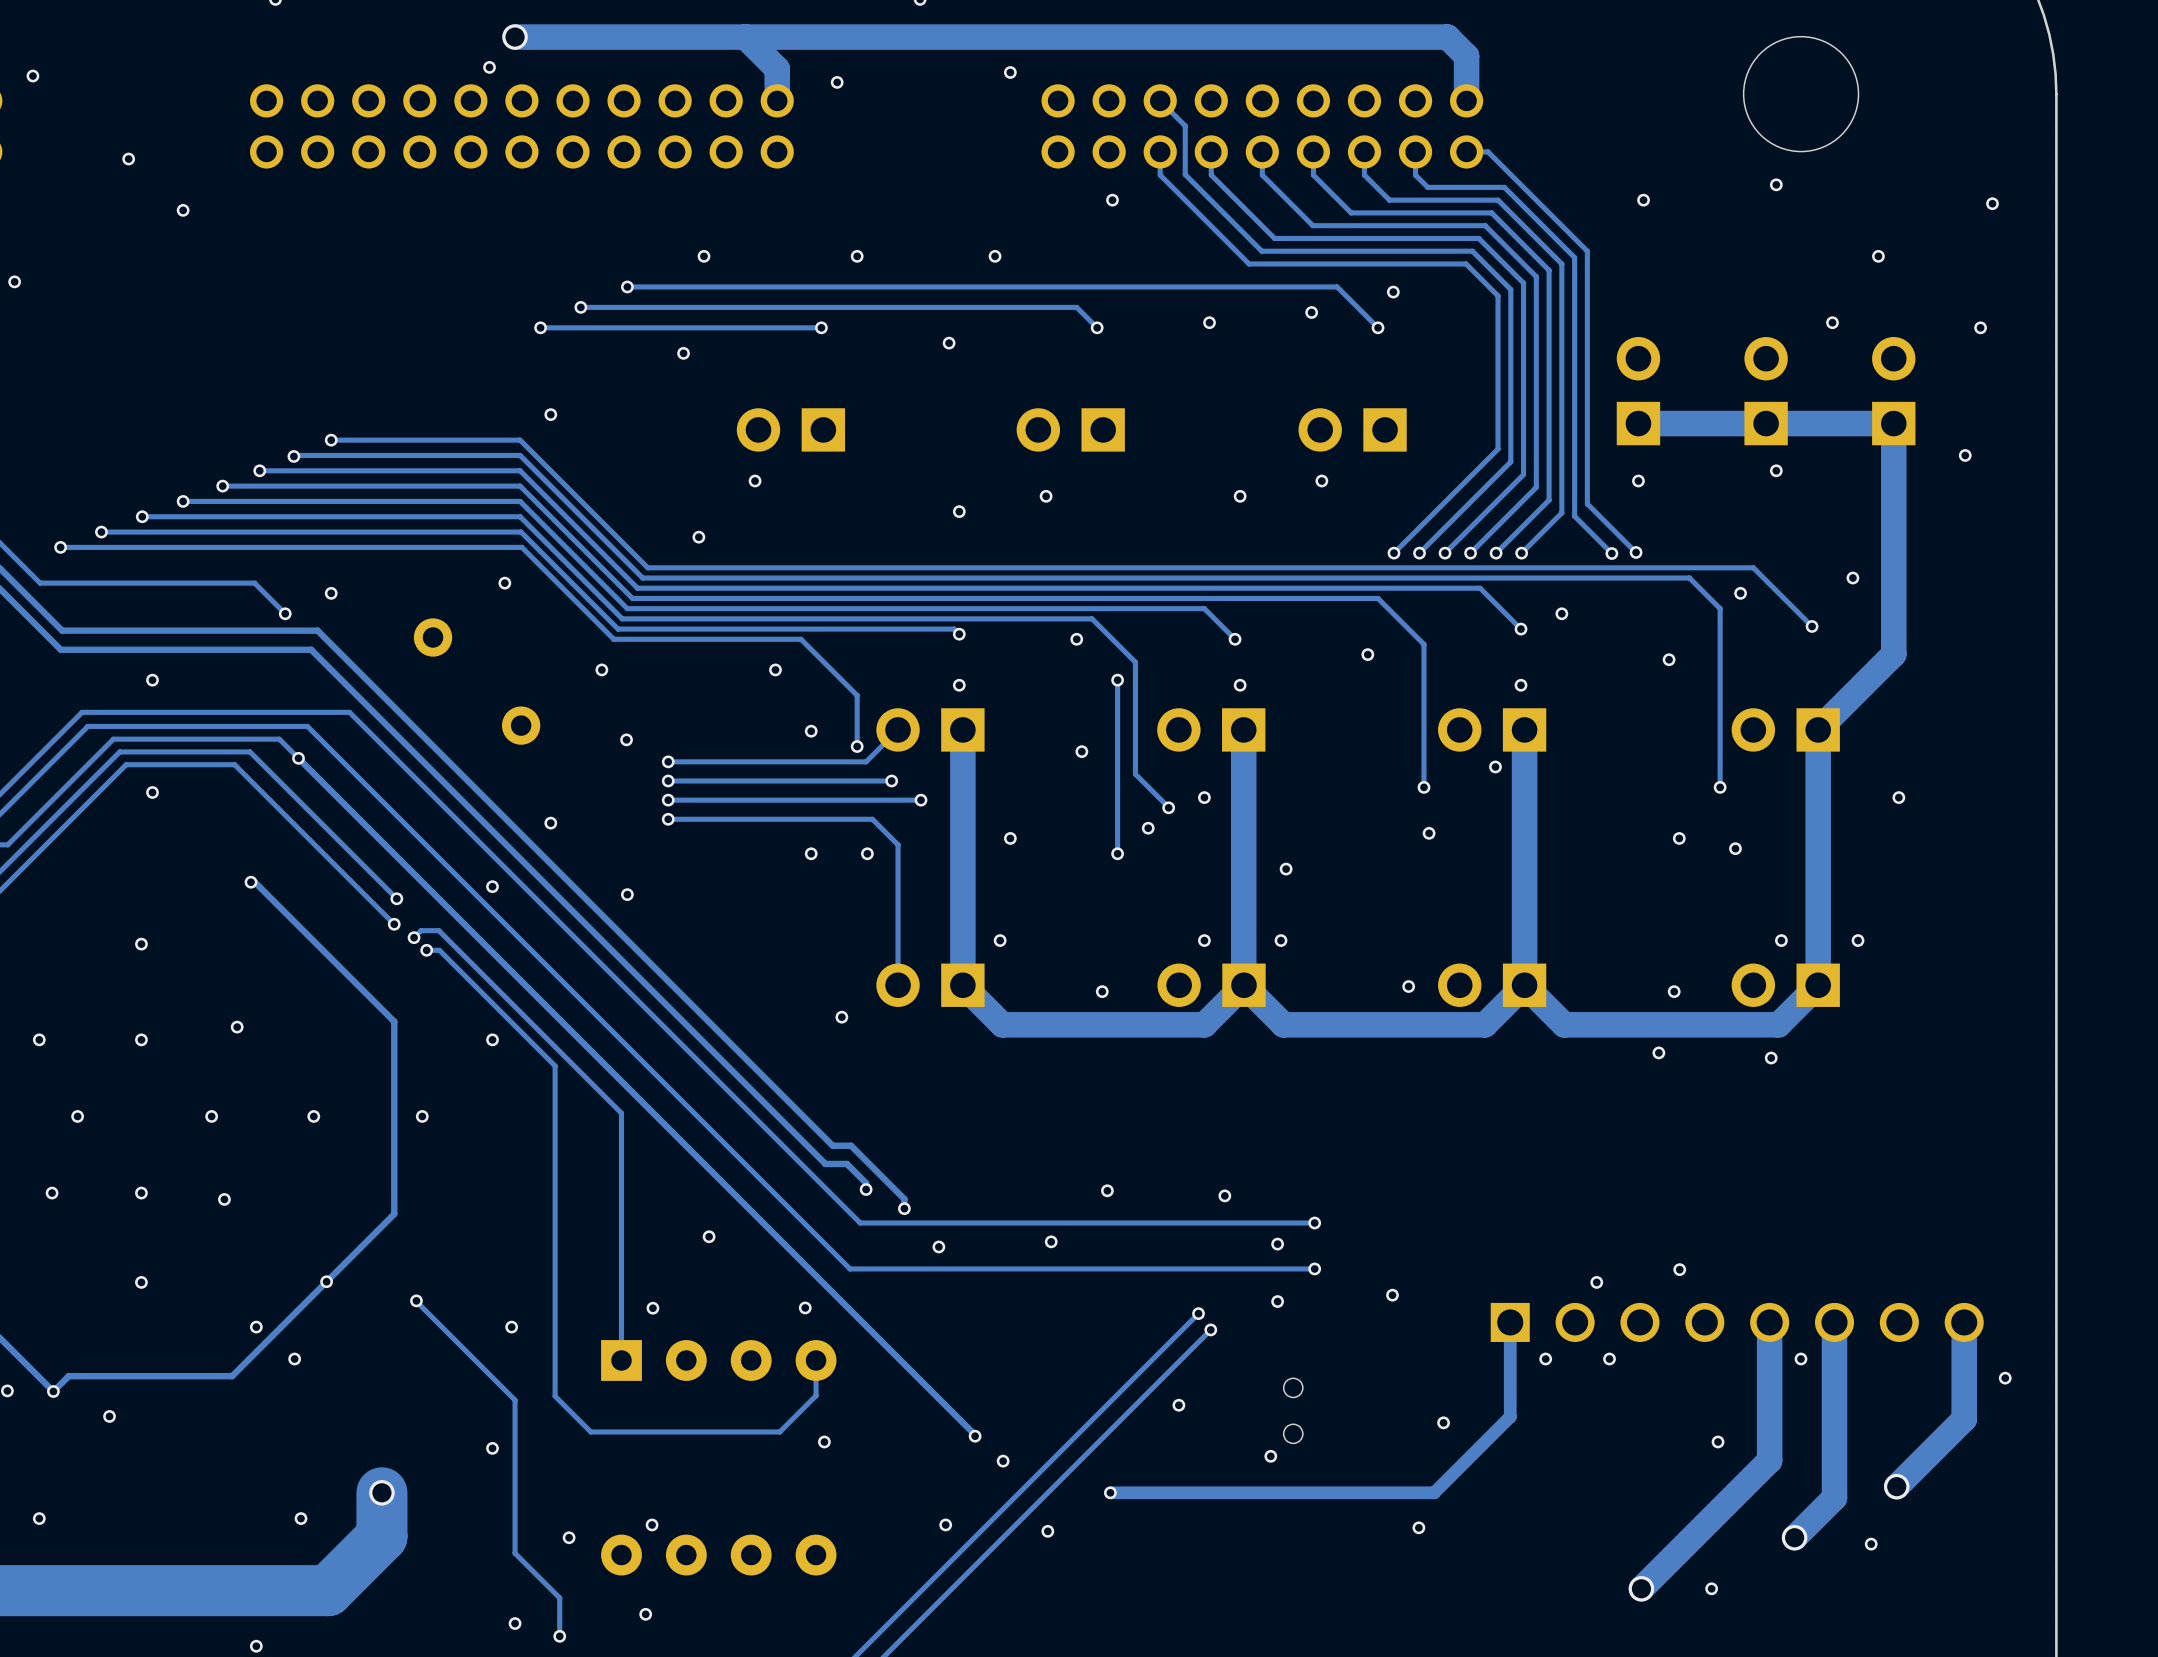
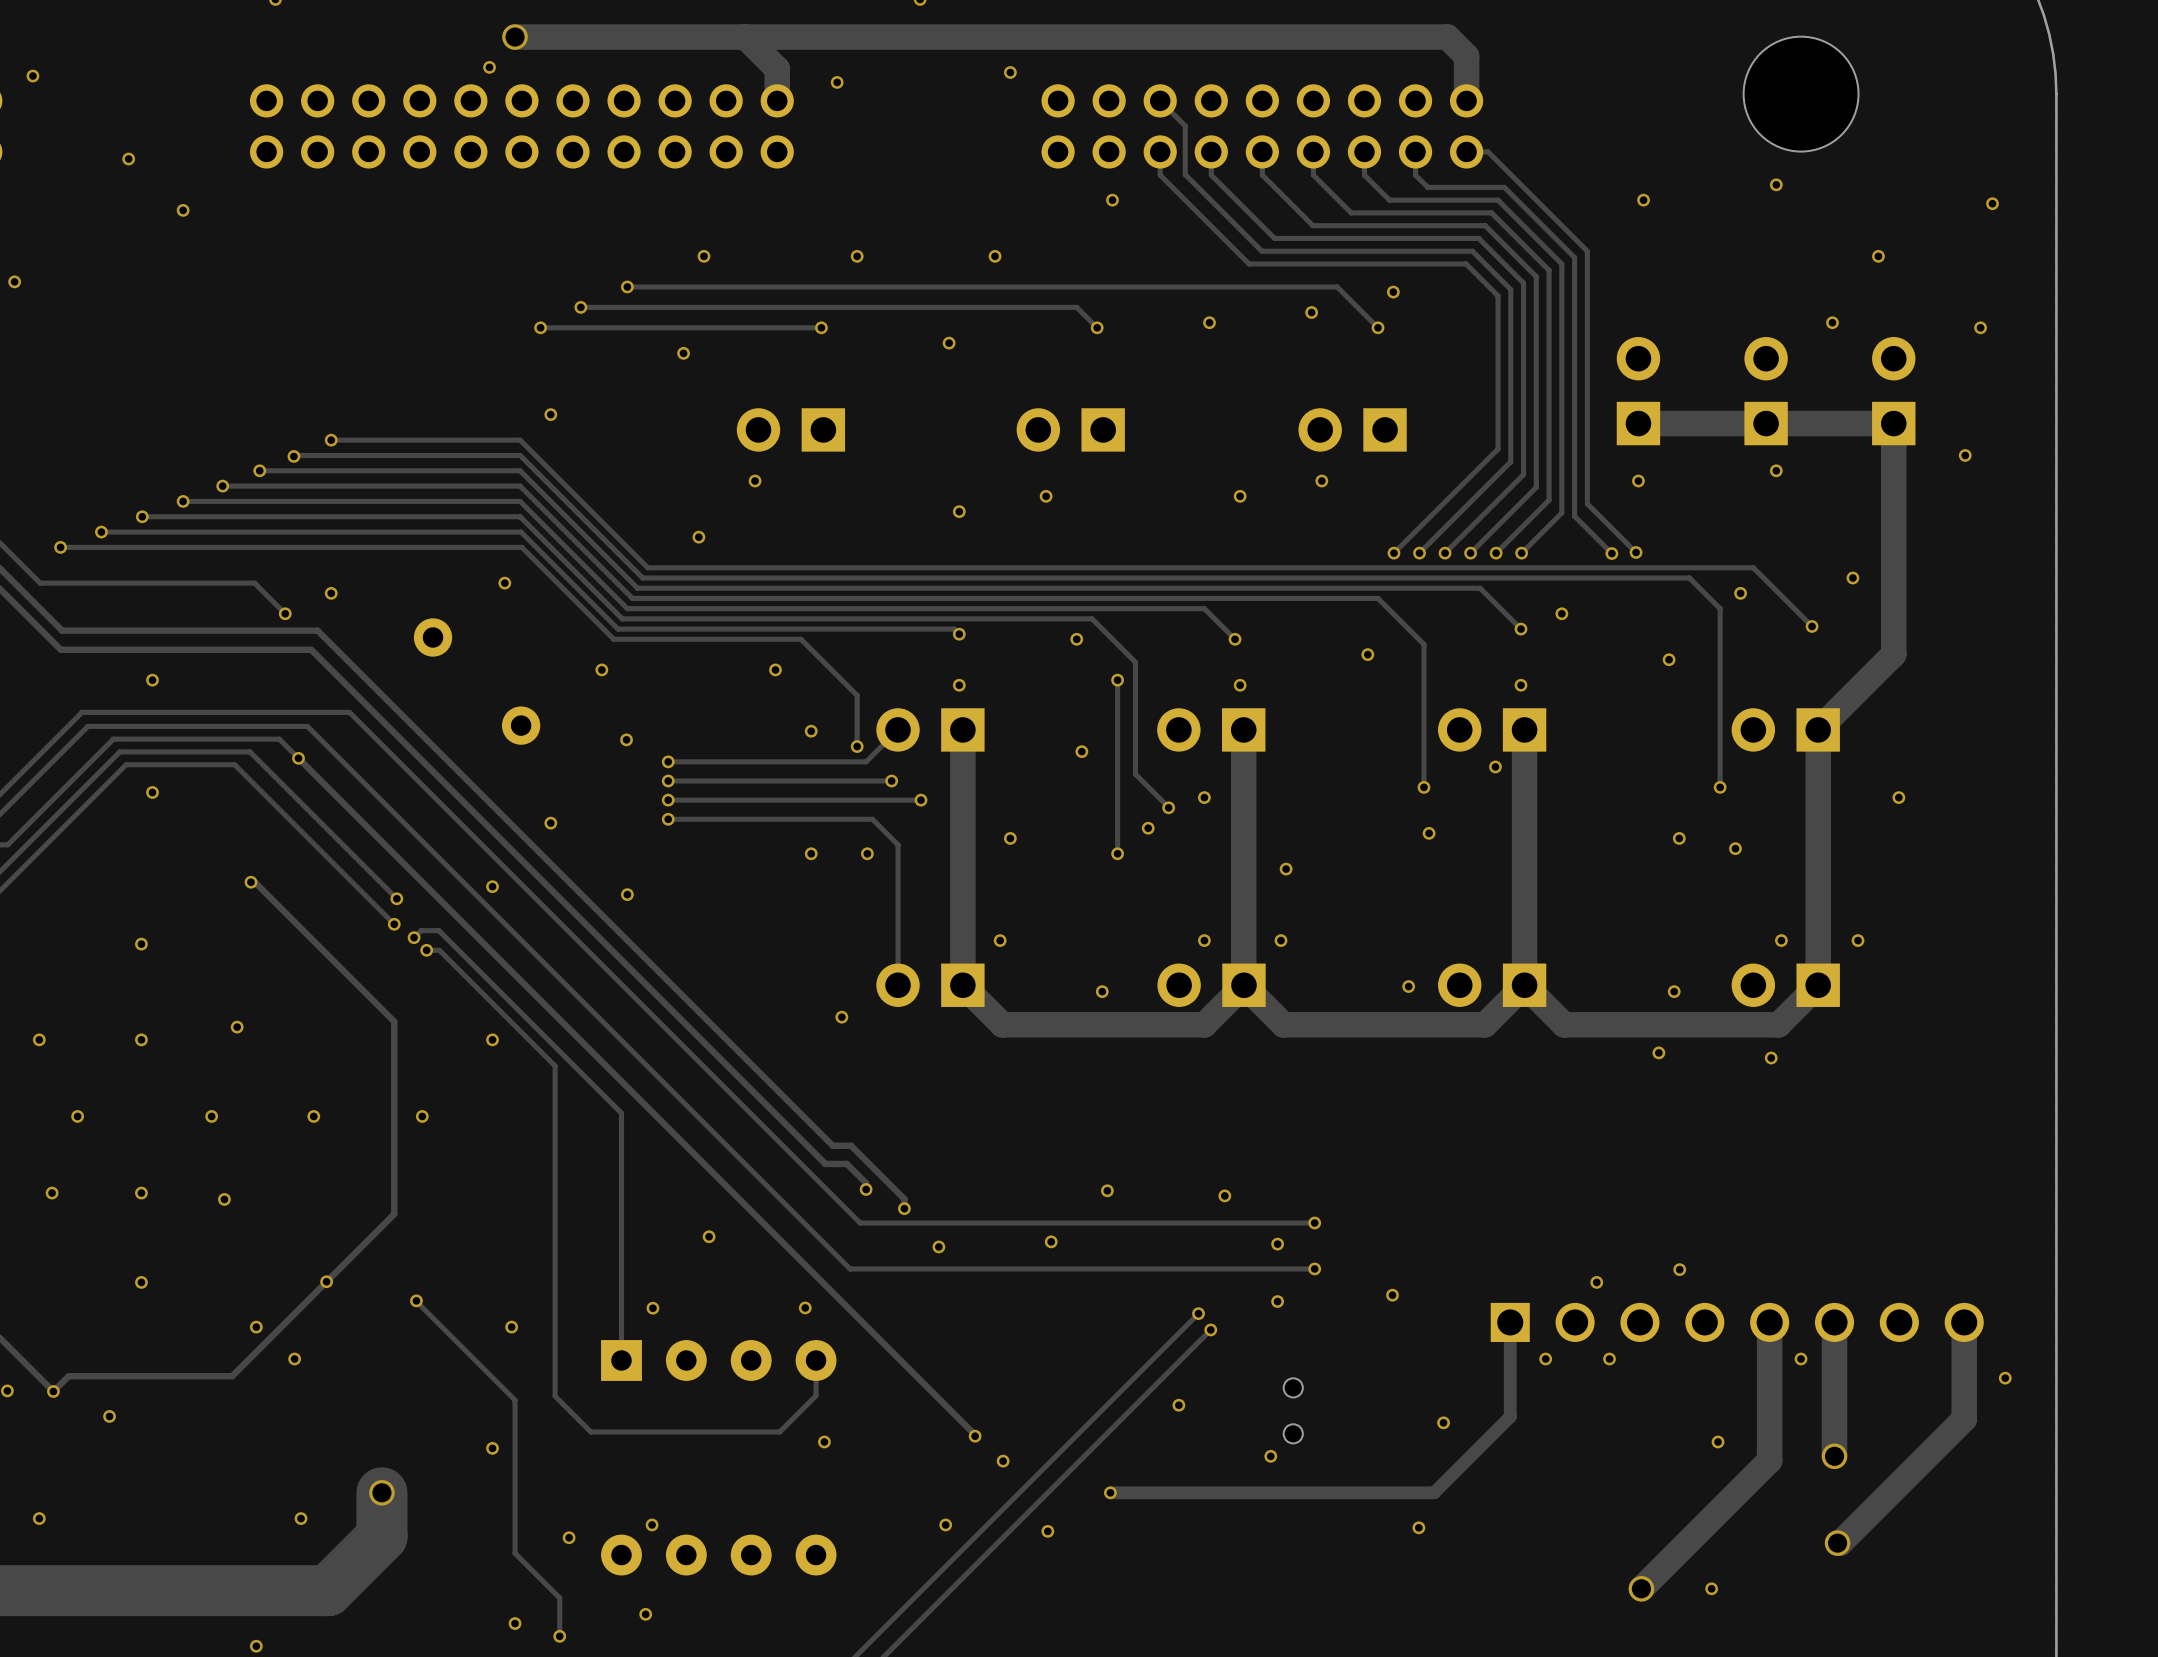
track: (1834, 1456) (1834, 1497) (1794, 1537) -> none
via: none -> (1834, 1456)
track: none -> (1896, 1486) (1840, 1543) (1837, 1543)
via: (1896, 1486) -> none
via: (1794, 1537) -> none
via: none -> (1837, 1543)
via: (1871, 1544) -> none

